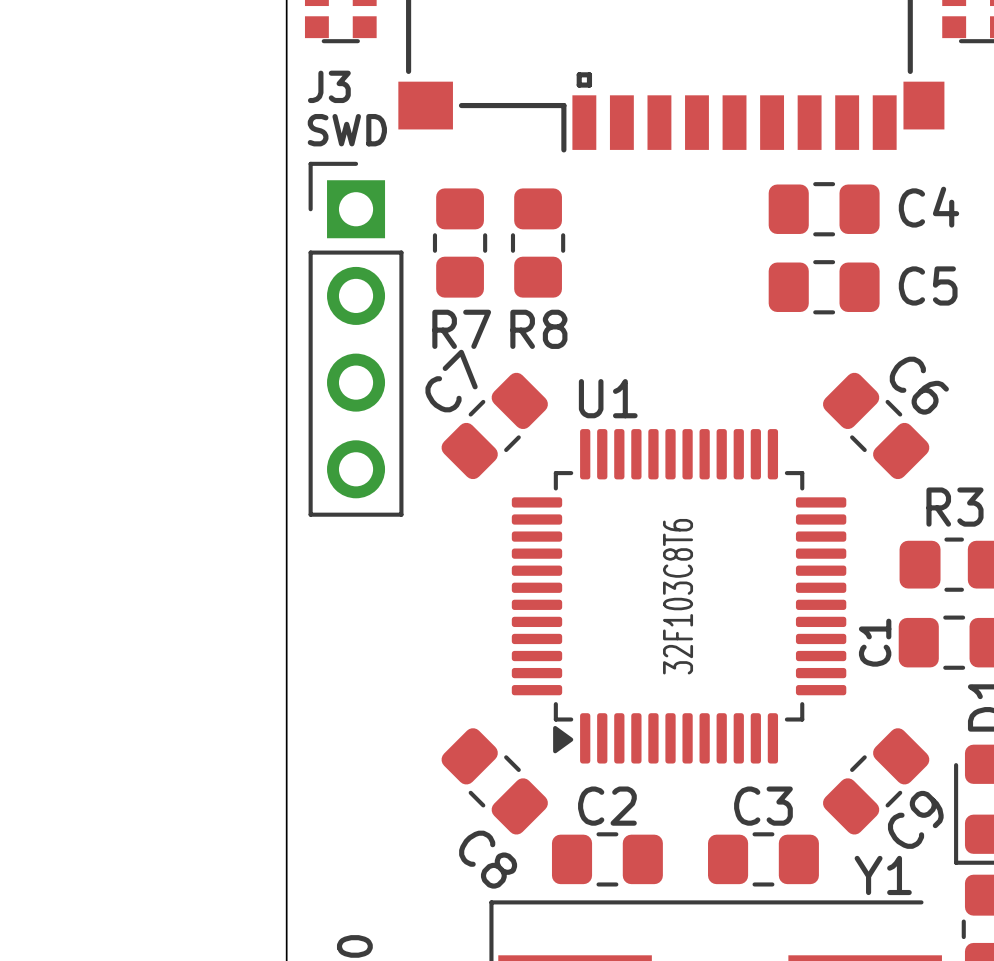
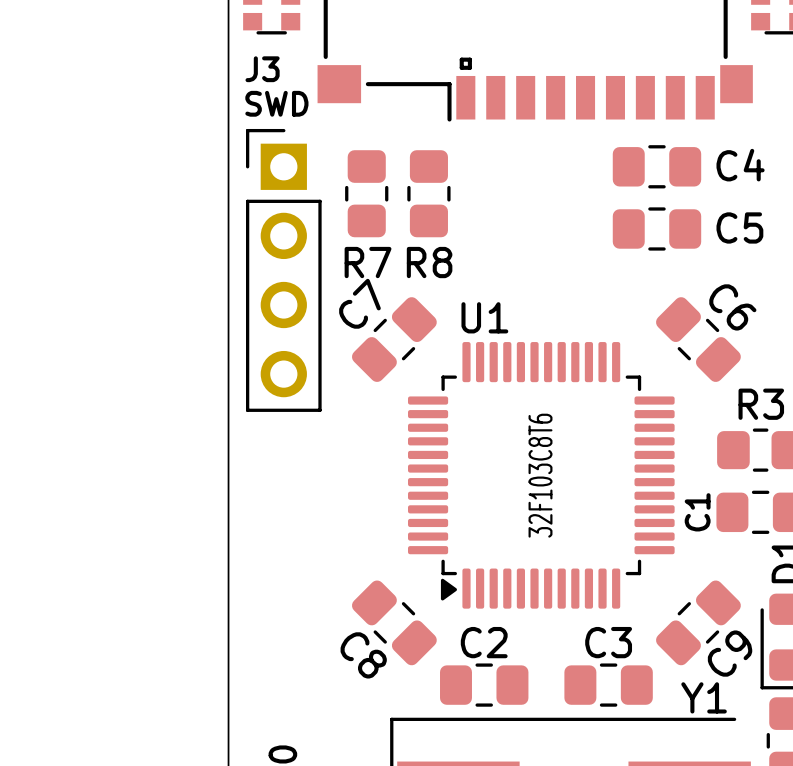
C8 name position: C8 (488, 859) -> C8 (363, 655)

